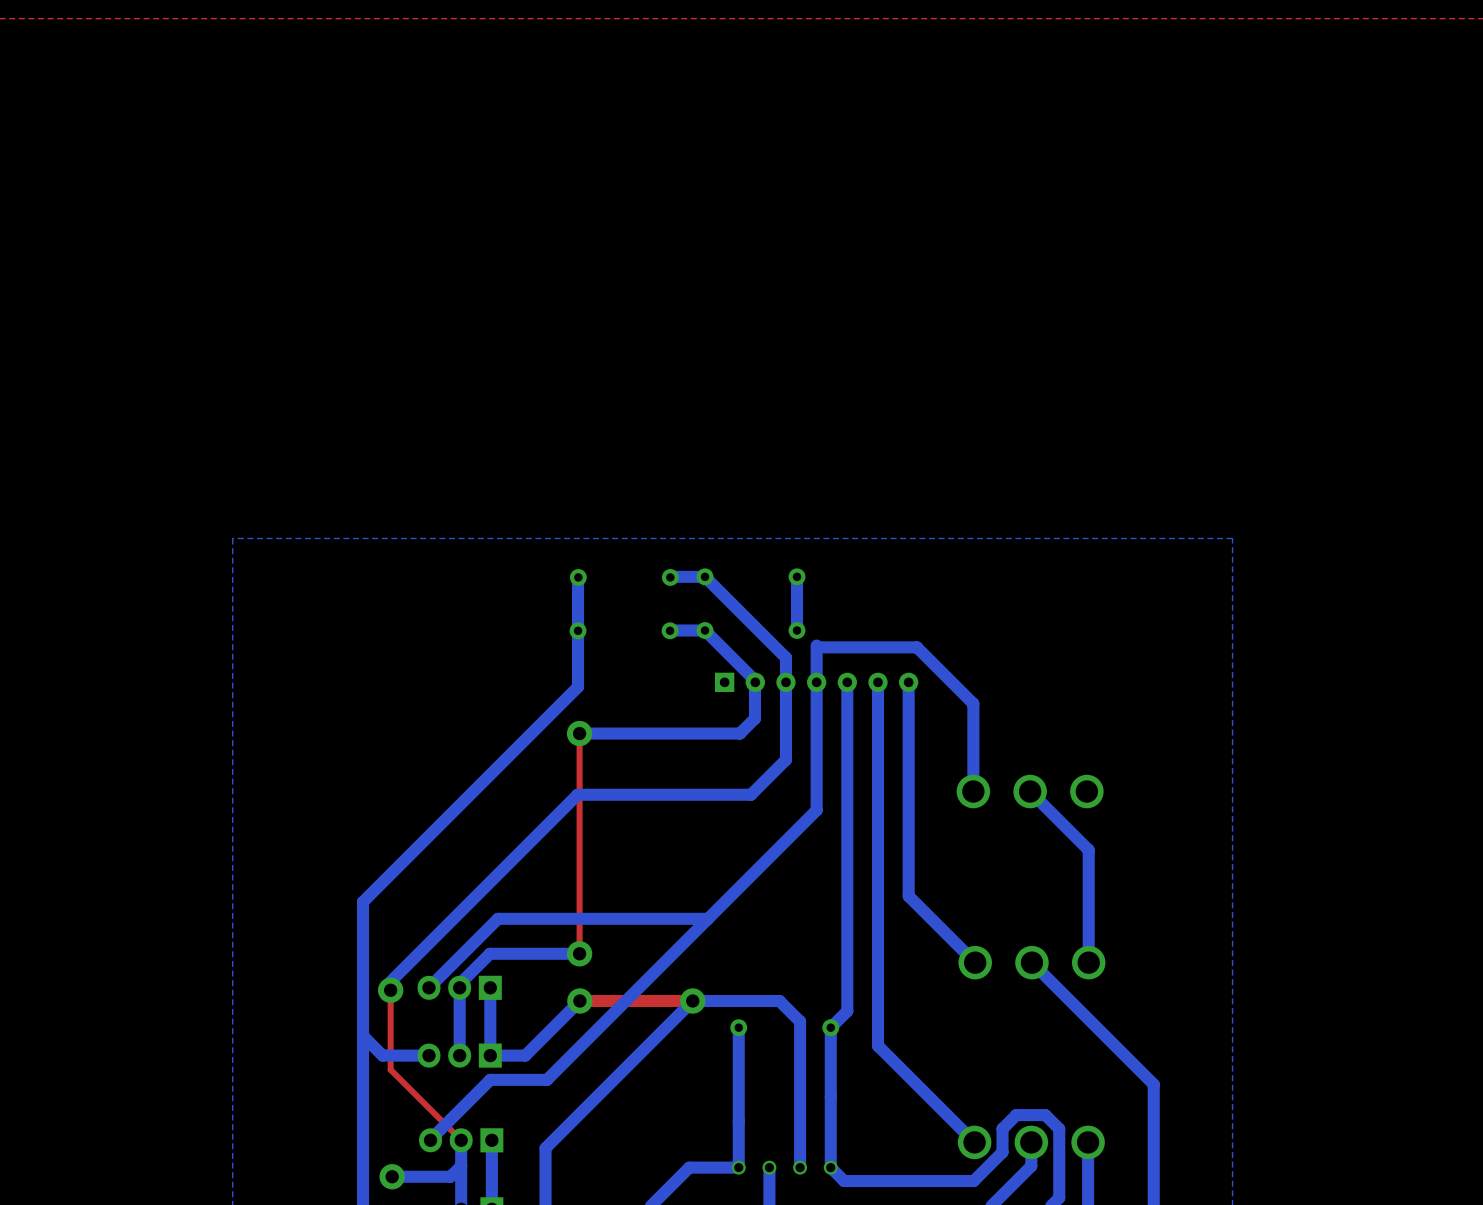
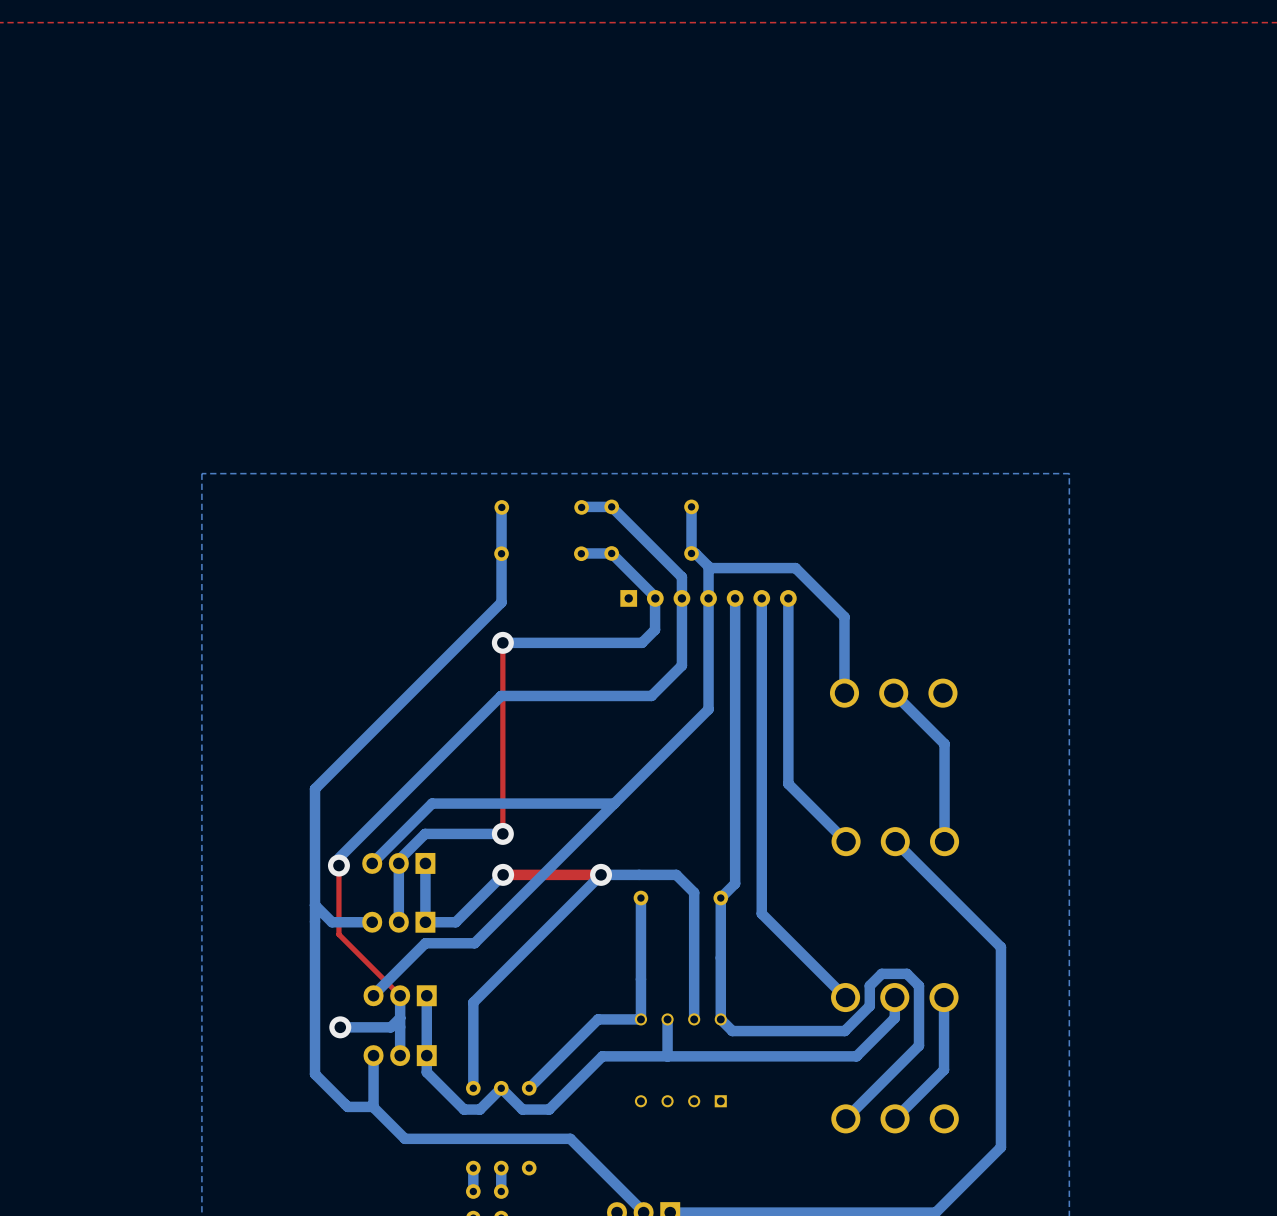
bottom track: none -> (691, 553) (695, 553) (708, 566)

